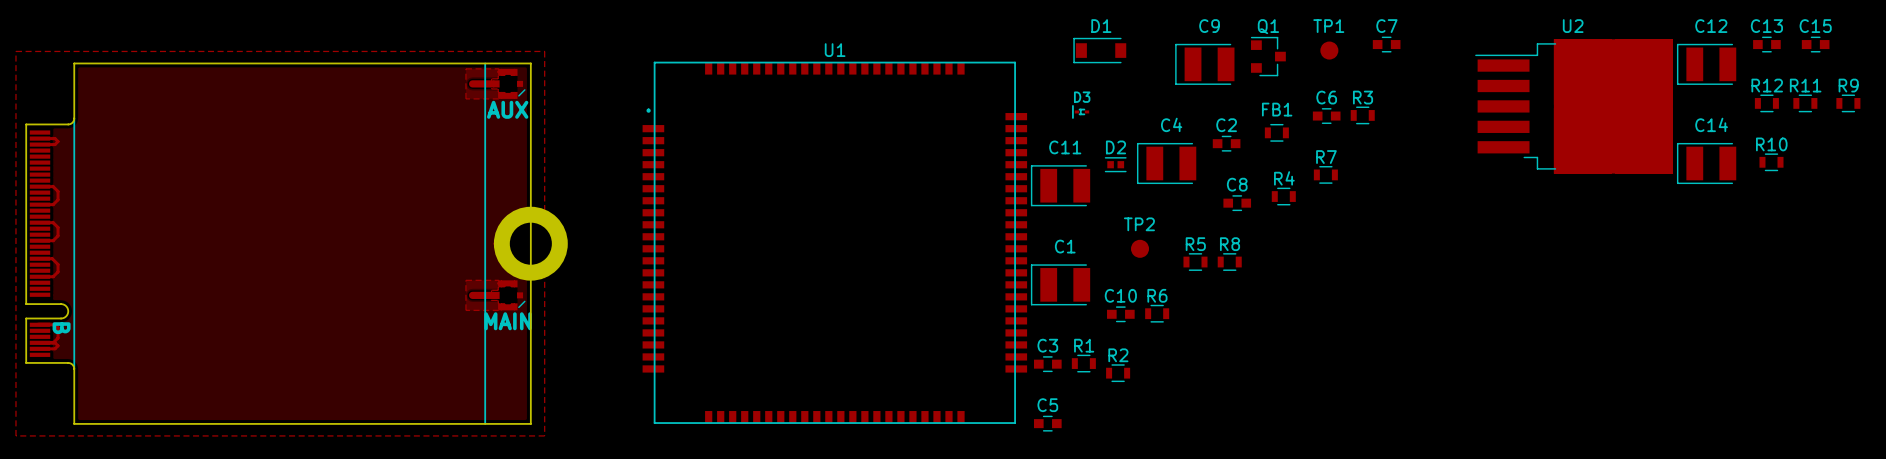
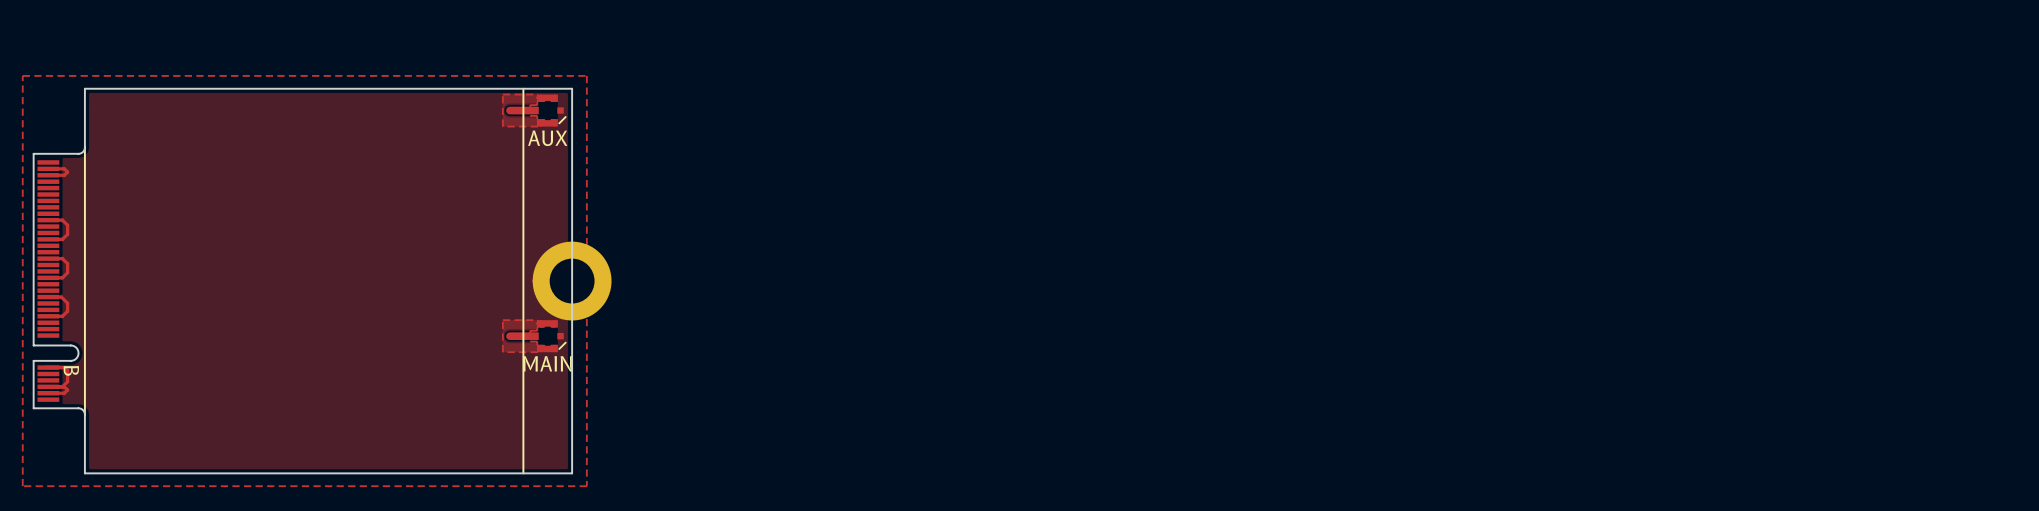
C7: (1386, 44) -> none
C13: (1766, 44) -> none
C15: (1815, 44) -> none
D1: (1099, 50) -> none
TP1: (1329, 50) -> none
Q1: (1268, 56) -> none
C9: (1204, 64) -> none
C12: (1706, 64) -> none
R12: (1766, 103) -> none
R11: (1805, 103) -> none
R9: (1848, 103) -> none
U2: (1574, 106) -> none
D3: (1080, 111) -> none
R3: (1362, 115) -> none
C6: (1326, 116) -> none
FB1: (1276, 132) -> none
C2: (1226, 143) -> none
R10: (1771, 162) -> none
C4: (1166, 163) -> none
C14: (1706, 163) -> none
D2: (1115, 164) -> none
R7: (1325, 174) -> none
C11: (1060, 185) -> none
R4: (1283, 196) -> none
C8: (1237, 203) -> none
U1: (834, 242) -> none
TP2: (1140, 248) -> none
R5: (1195, 262) -> none
R8: (1229, 262) -> none
C1: (1060, 284) -> none
R6: (1157, 313) -> none
C10: (1120, 314) -> none
R1: (1083, 363) -> none
C3: (1047, 364) -> none
R2: (1118, 373) -> none
C5: (1047, 423) -> none

